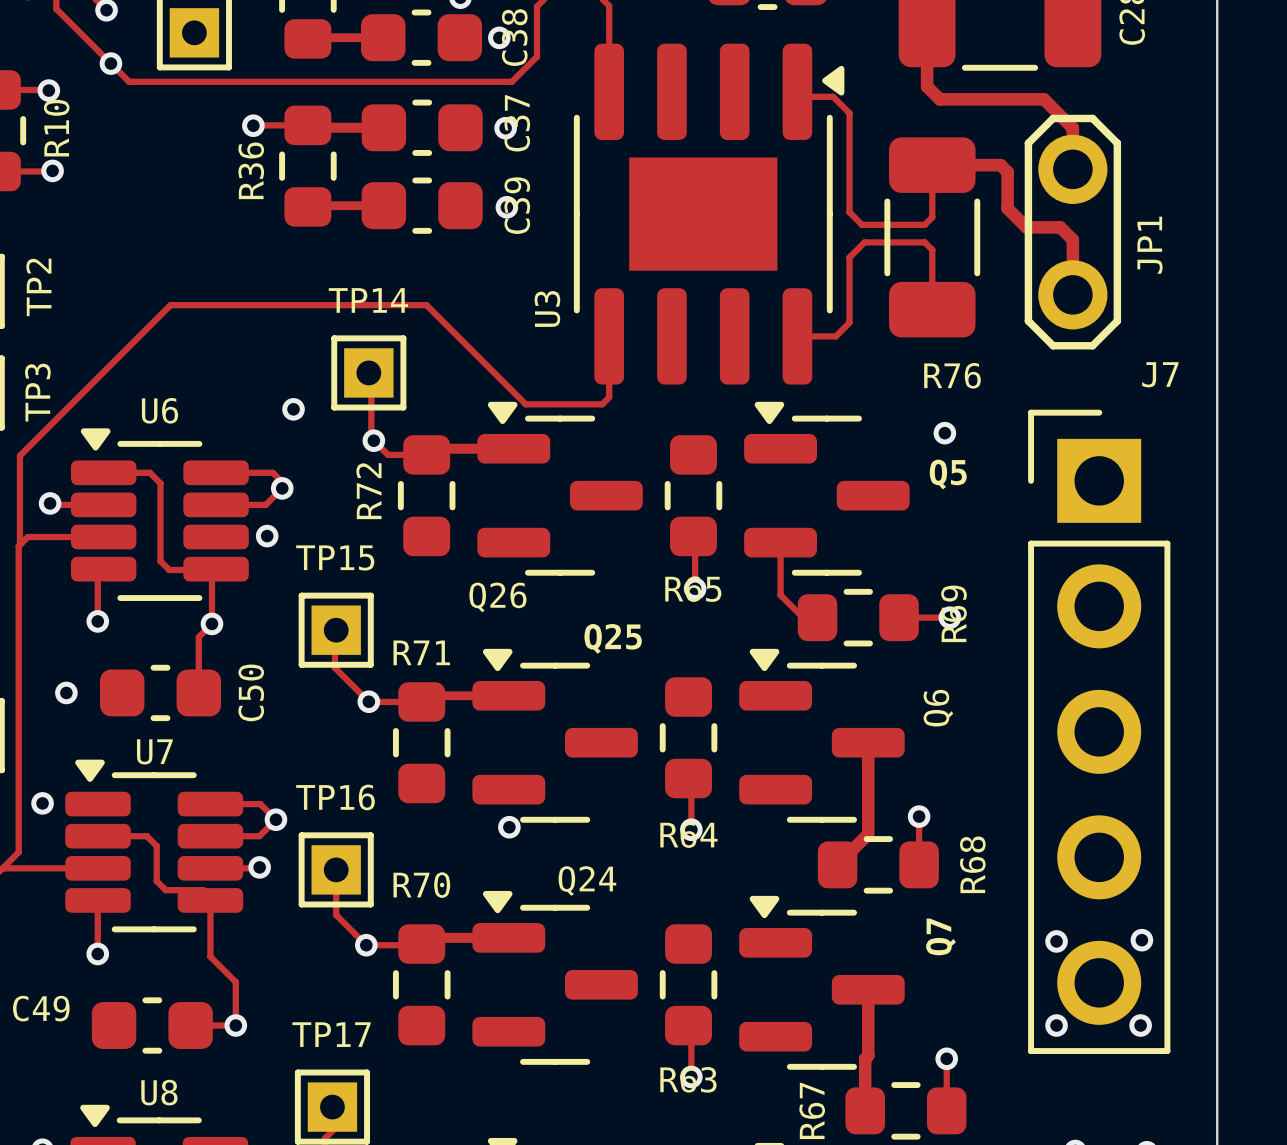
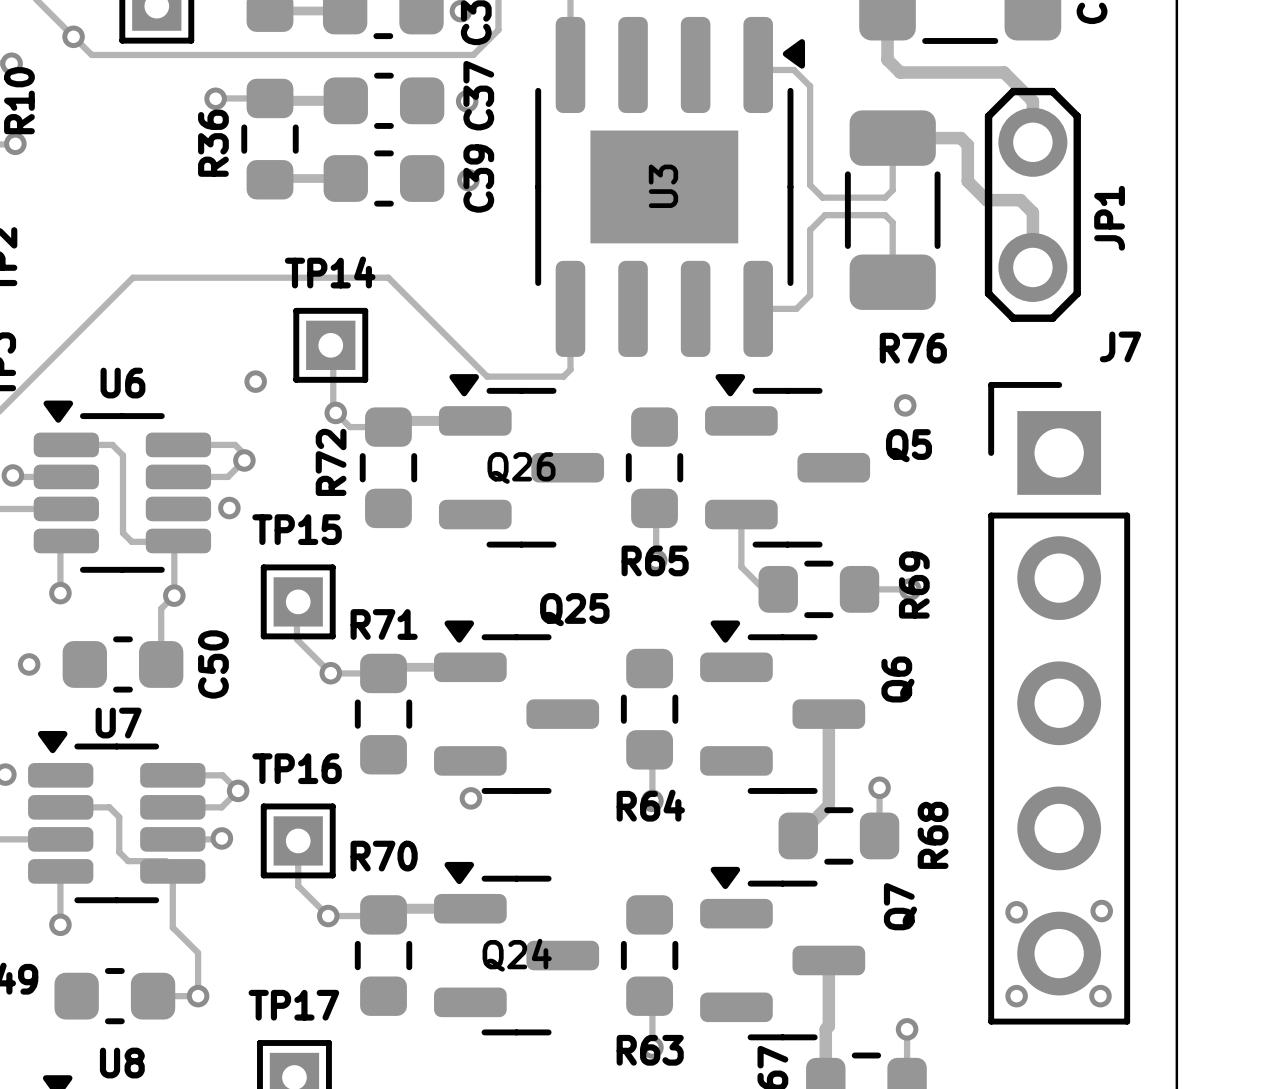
U3 name position: U3 (547, 308) -> U3 (663, 186)
Q26 name position: Q26 (497, 597) -> Q26 (521, 467)
Q24 name position: Q24 (587, 881) -> Q24 (517, 955)

